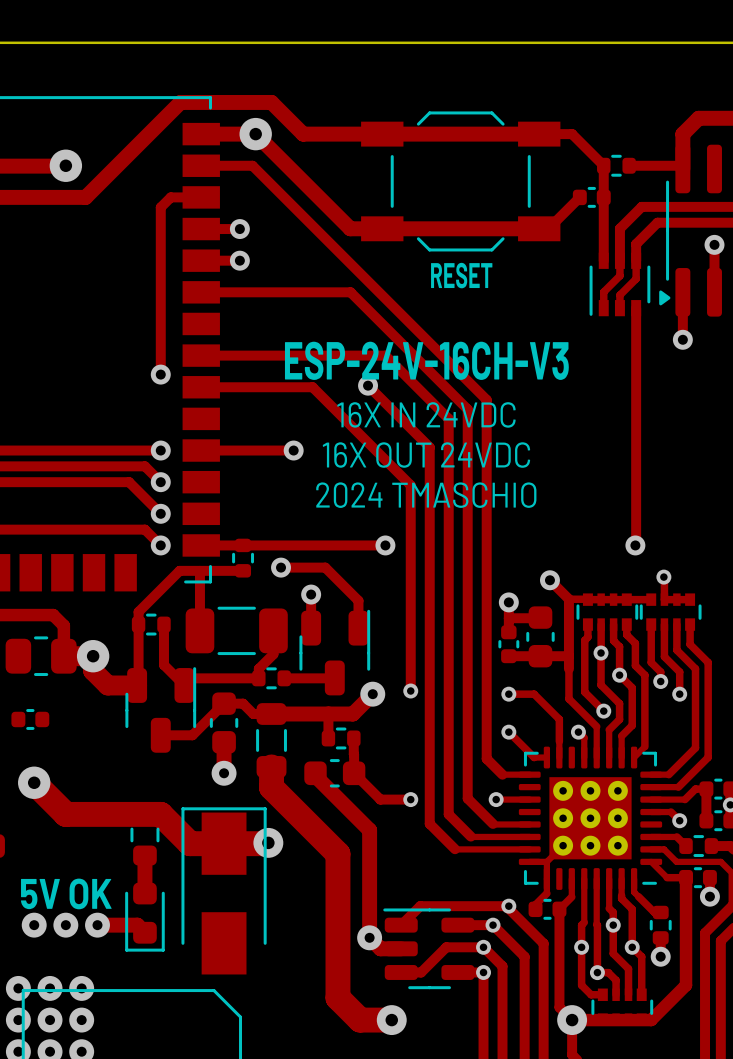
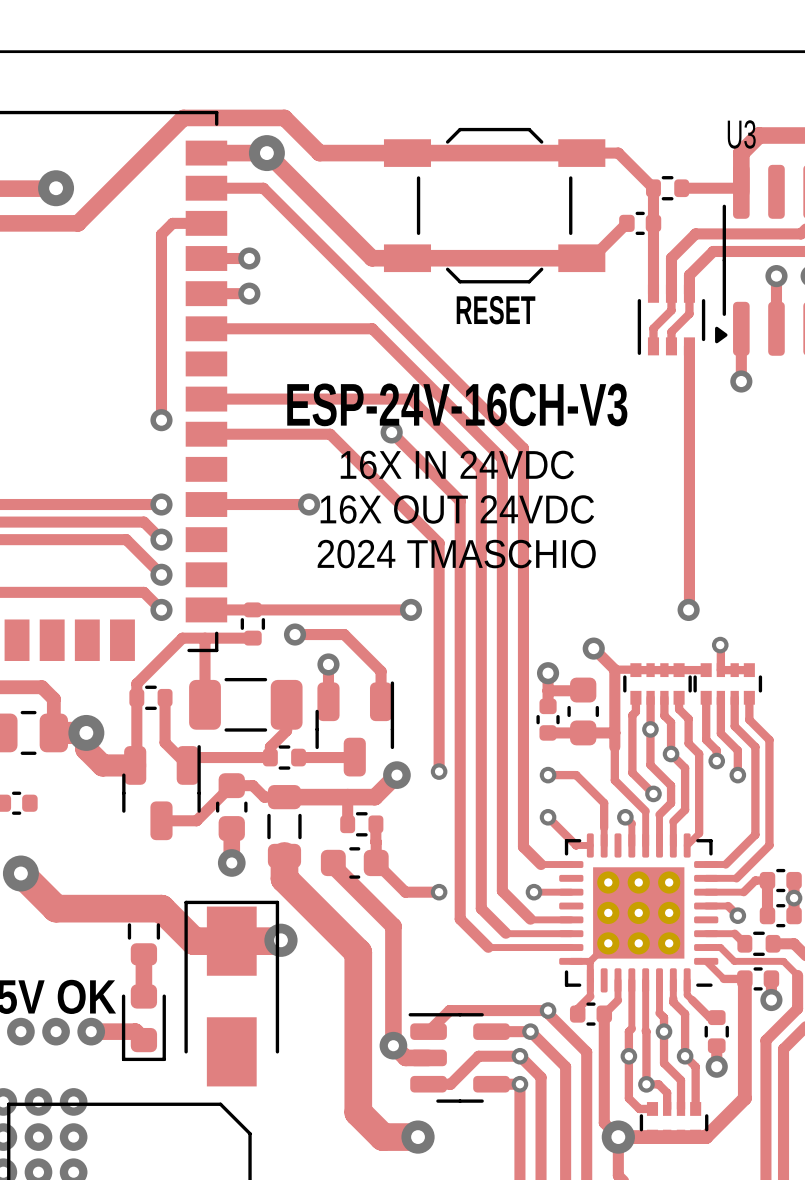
U3 name: none -> U3 (741, 134)

